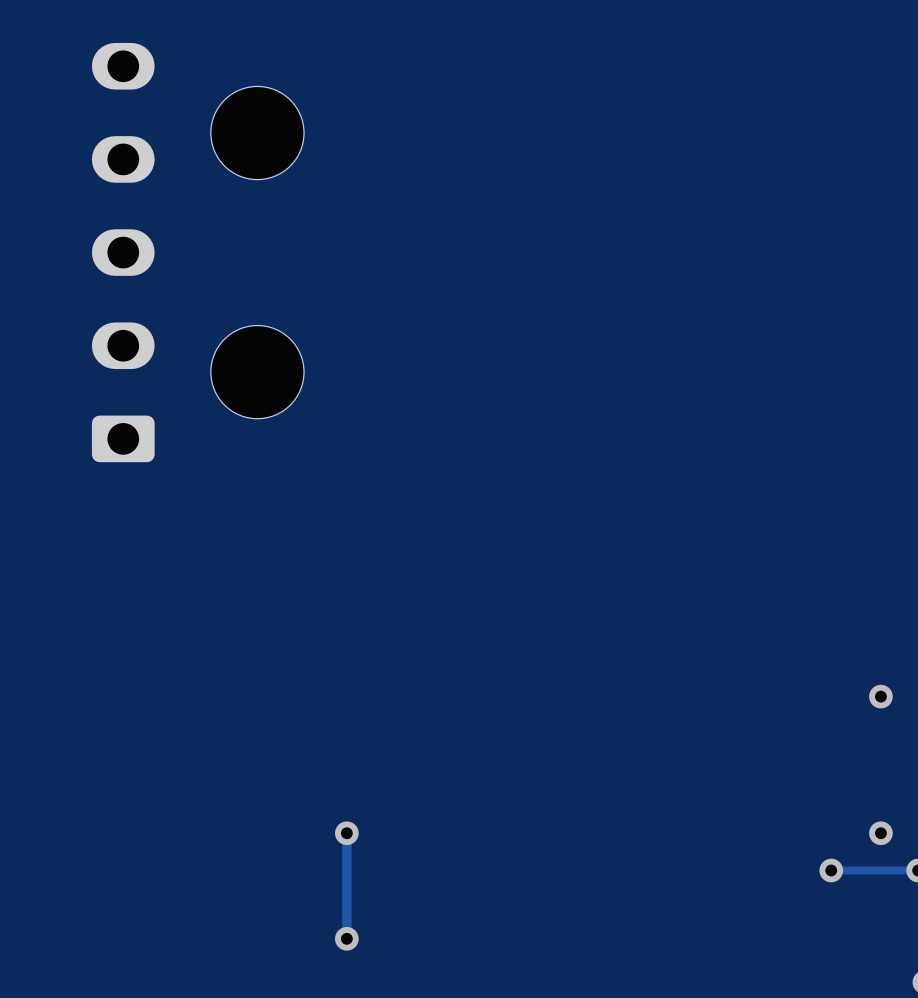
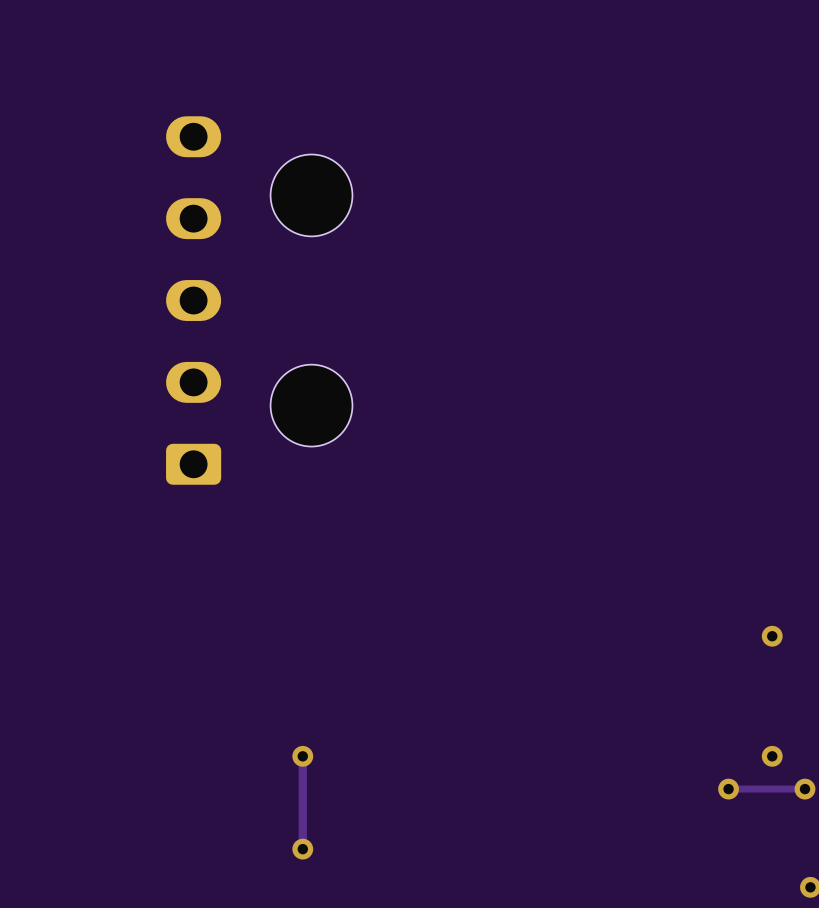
part position: (197, 252) -> (259, 300)

